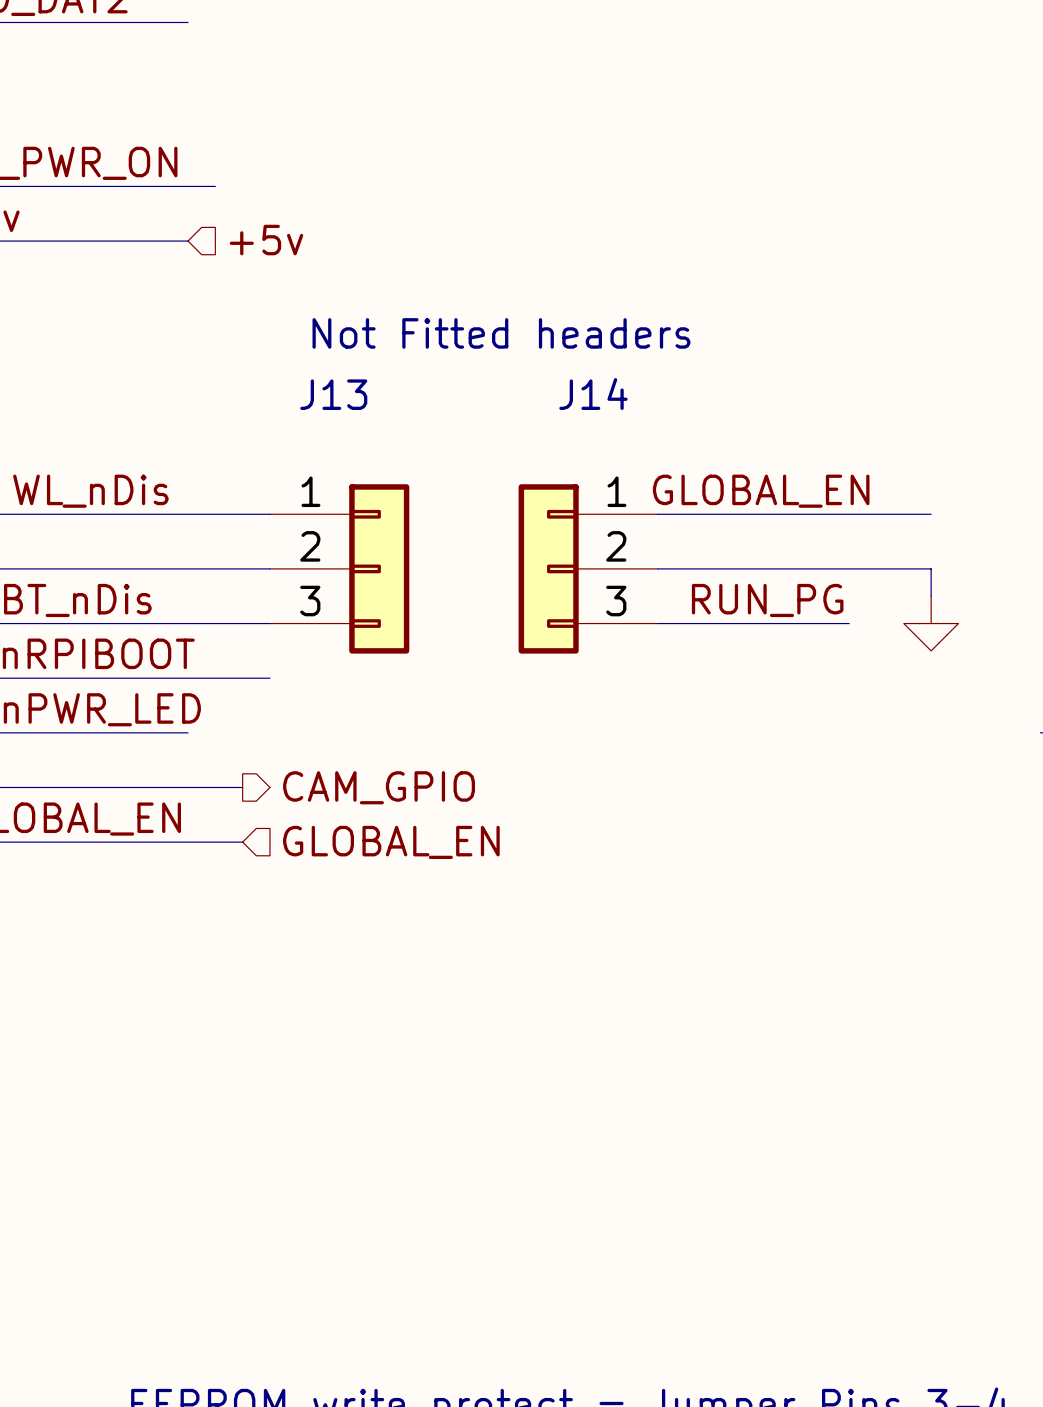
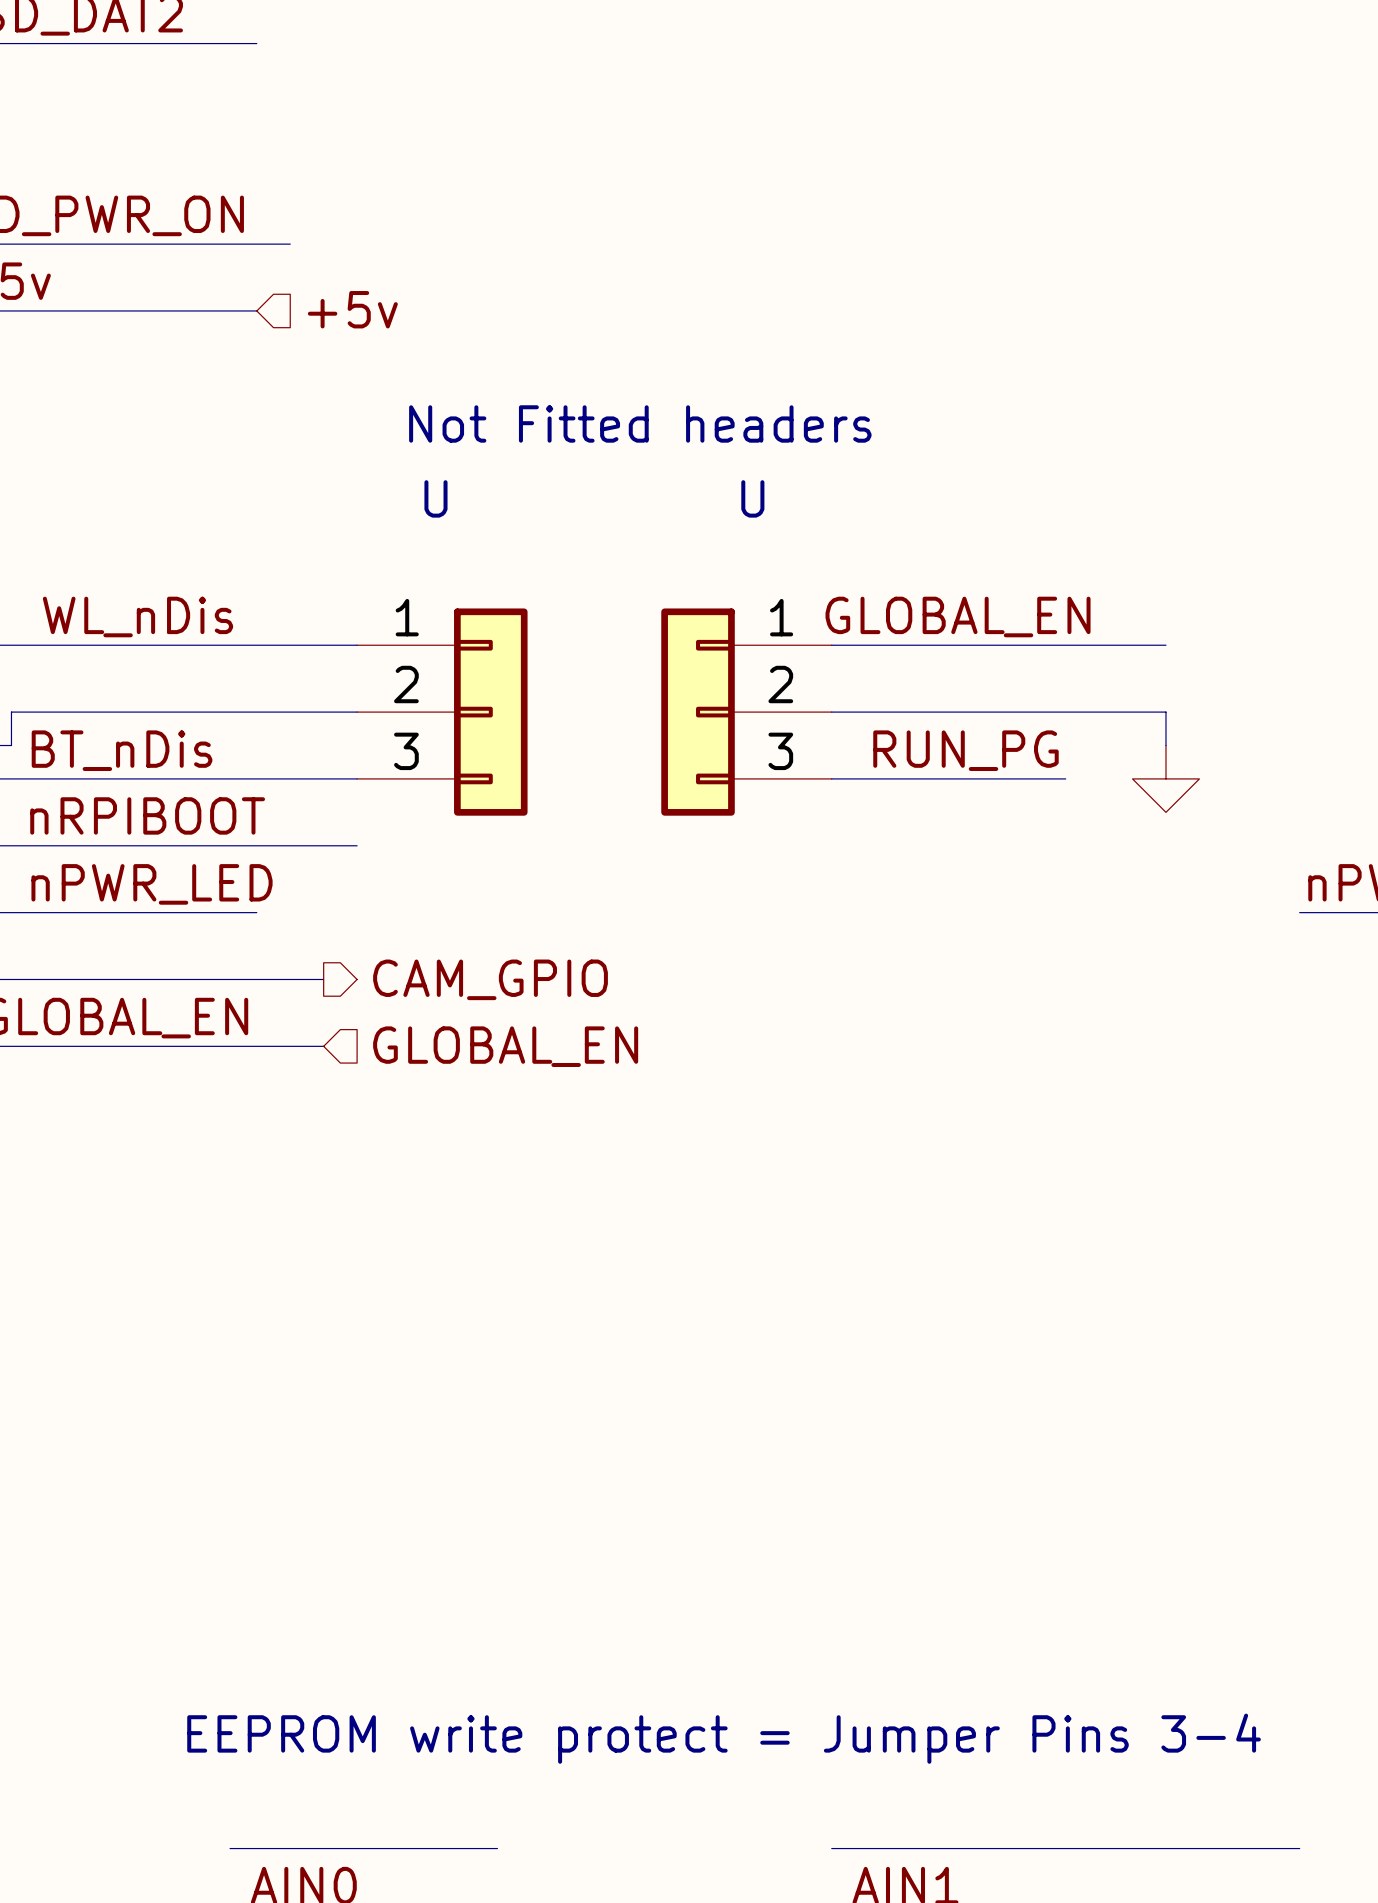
J13 name: J13 (333, 394) -> U (435, 498)
J14 name: J14 (593, 394) -> U (752, 498)

